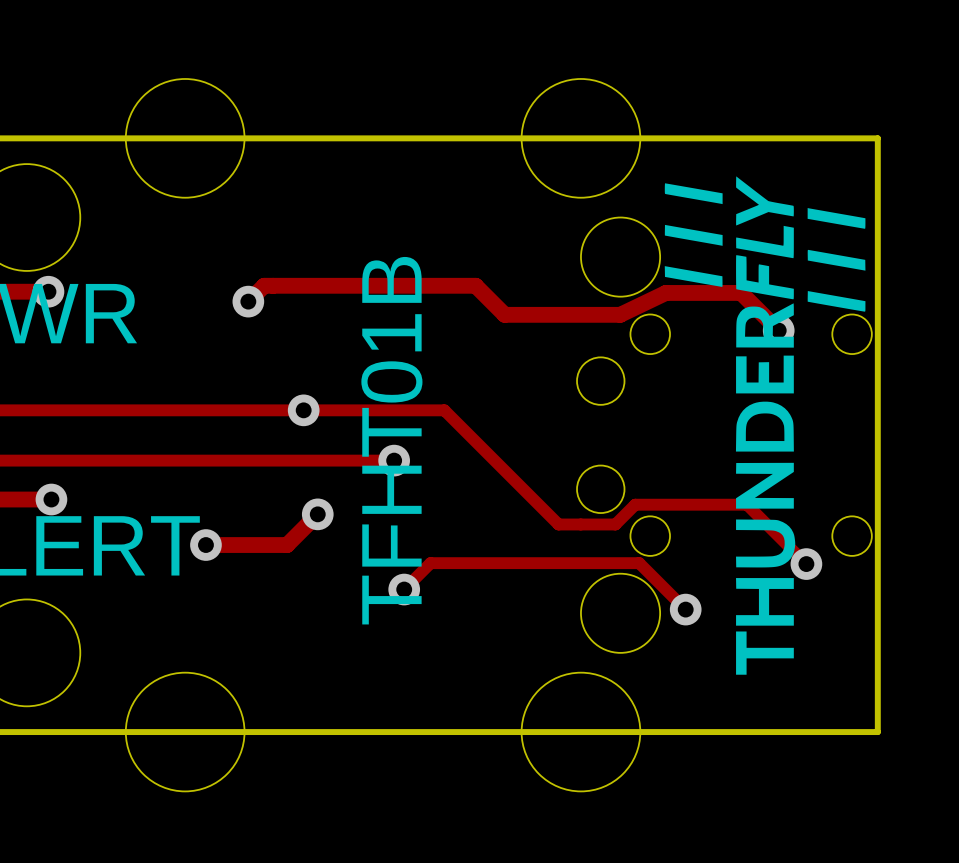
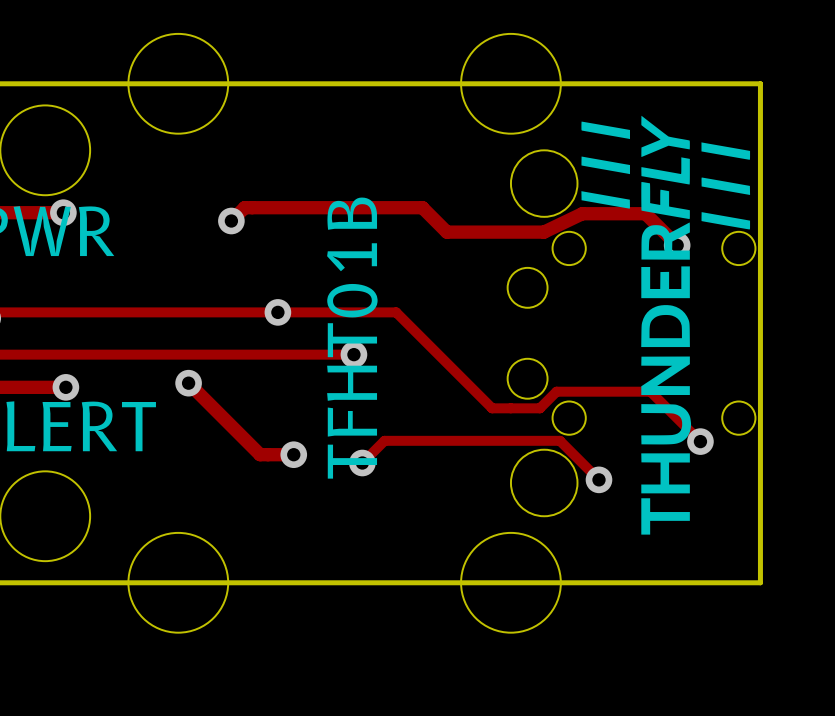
track: none -> (188, 383) (260, 454) (293, 454)
track: (317, 514) (287, 545) (205, 545) -> none
via: (317, 514) -> none
via position: (205, 545) -> (188, 383)
via: none -> (293, 454)

